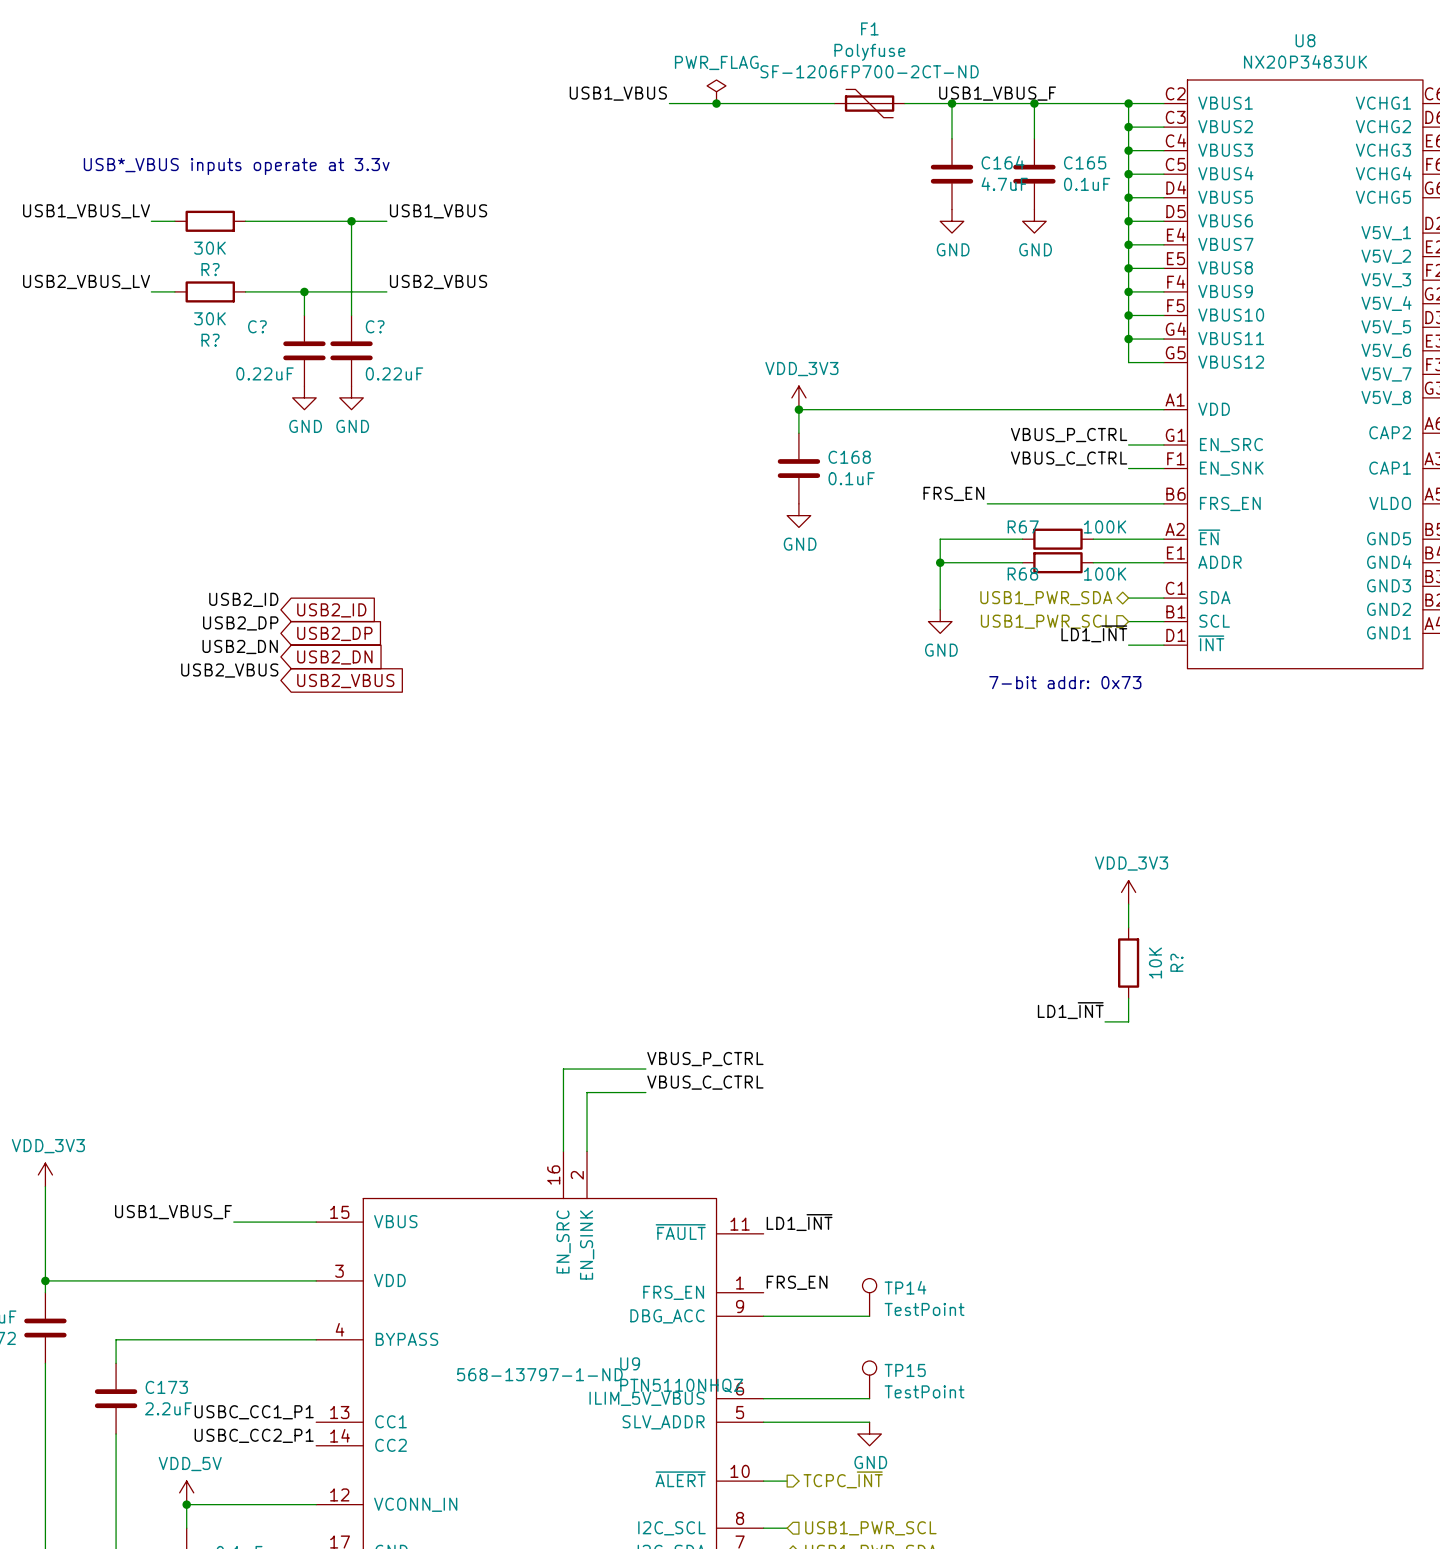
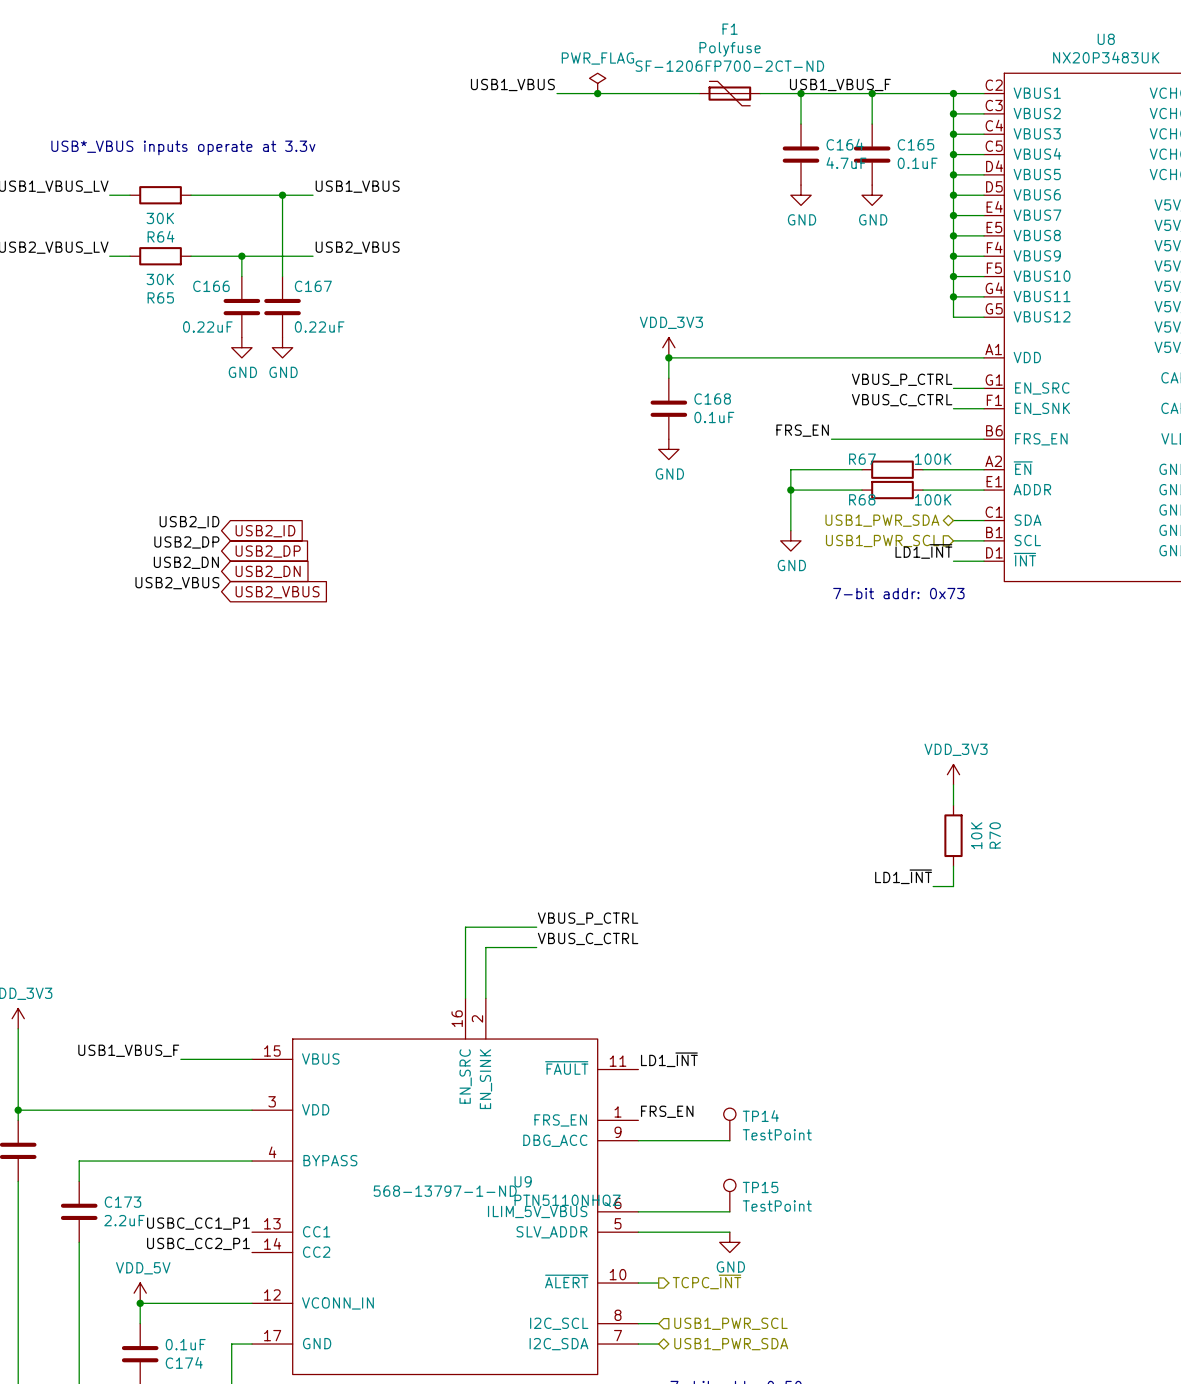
R? name: R? (210, 269) -> R64 (161, 236)
C? name: C? (257, 326) -> C166 (211, 286)
C? name: C? (375, 326) -> C167 (313, 286)
R? name: R? (210, 340) -> R65 (160, 297)
R? name: R? (1176, 962) -> R70 (995, 835)

